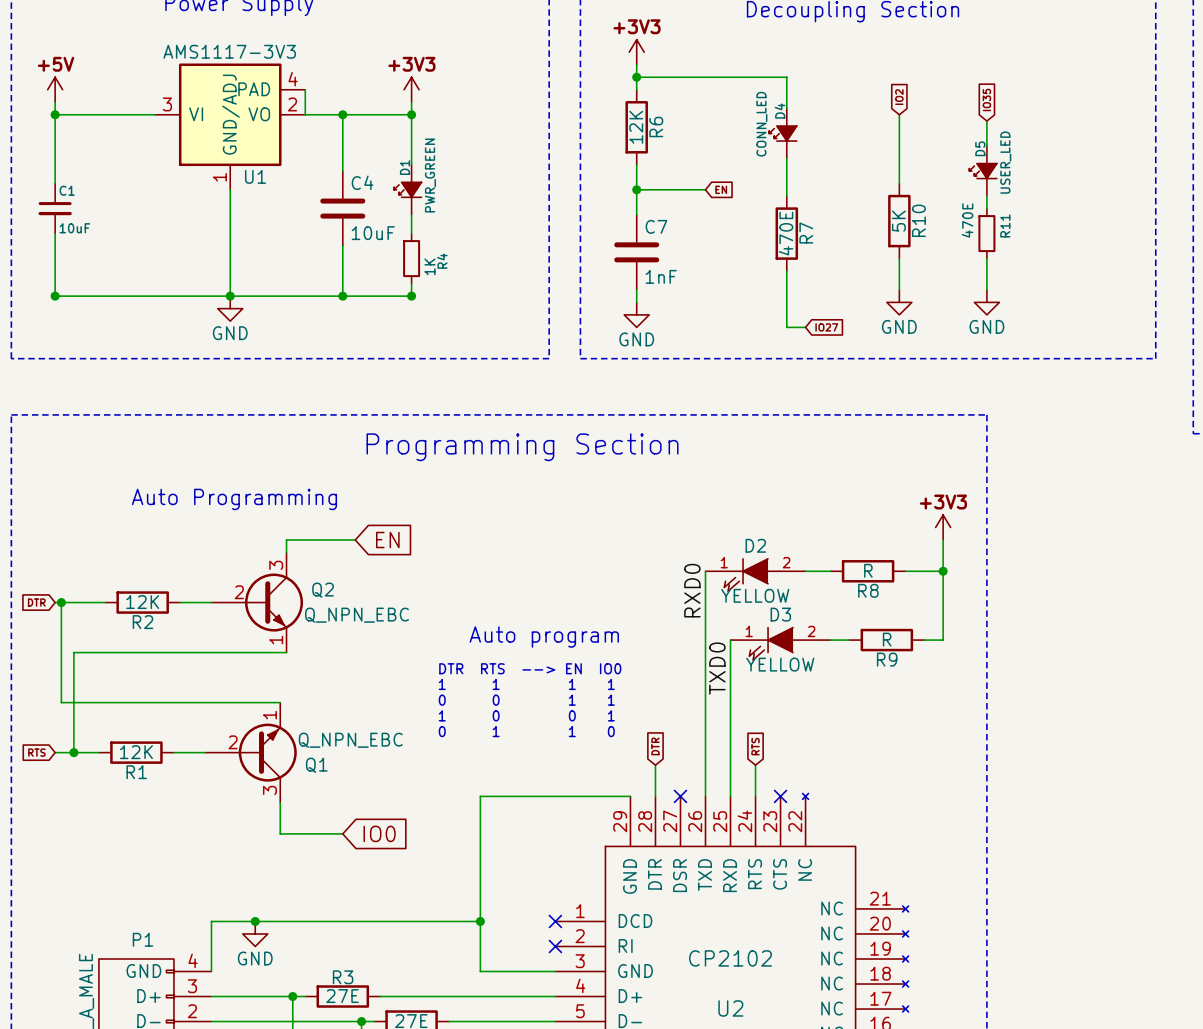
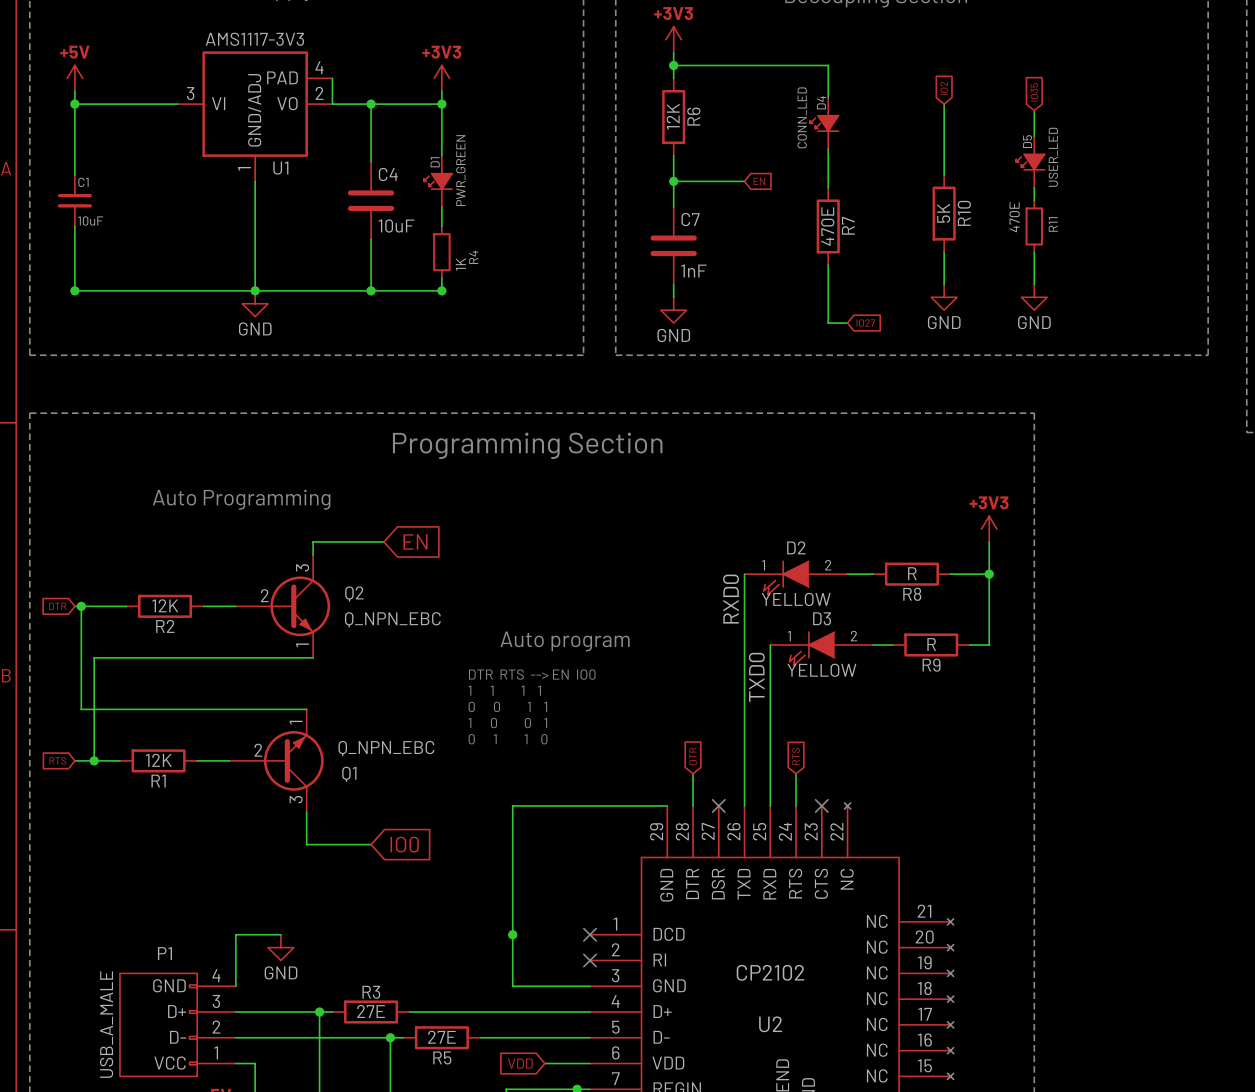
wire: (255, 921) (480, 921) -> none
junction: (255, 921) -> none

